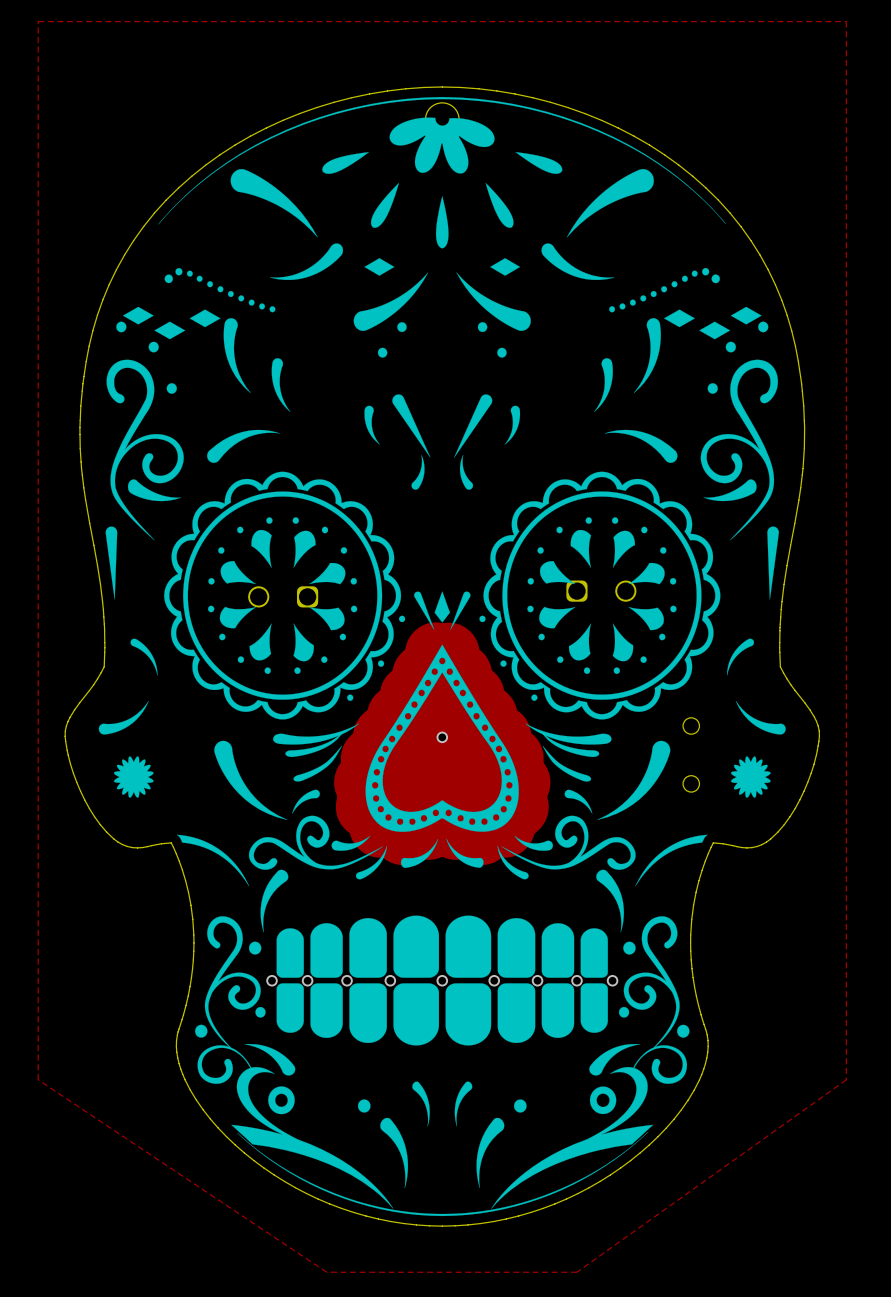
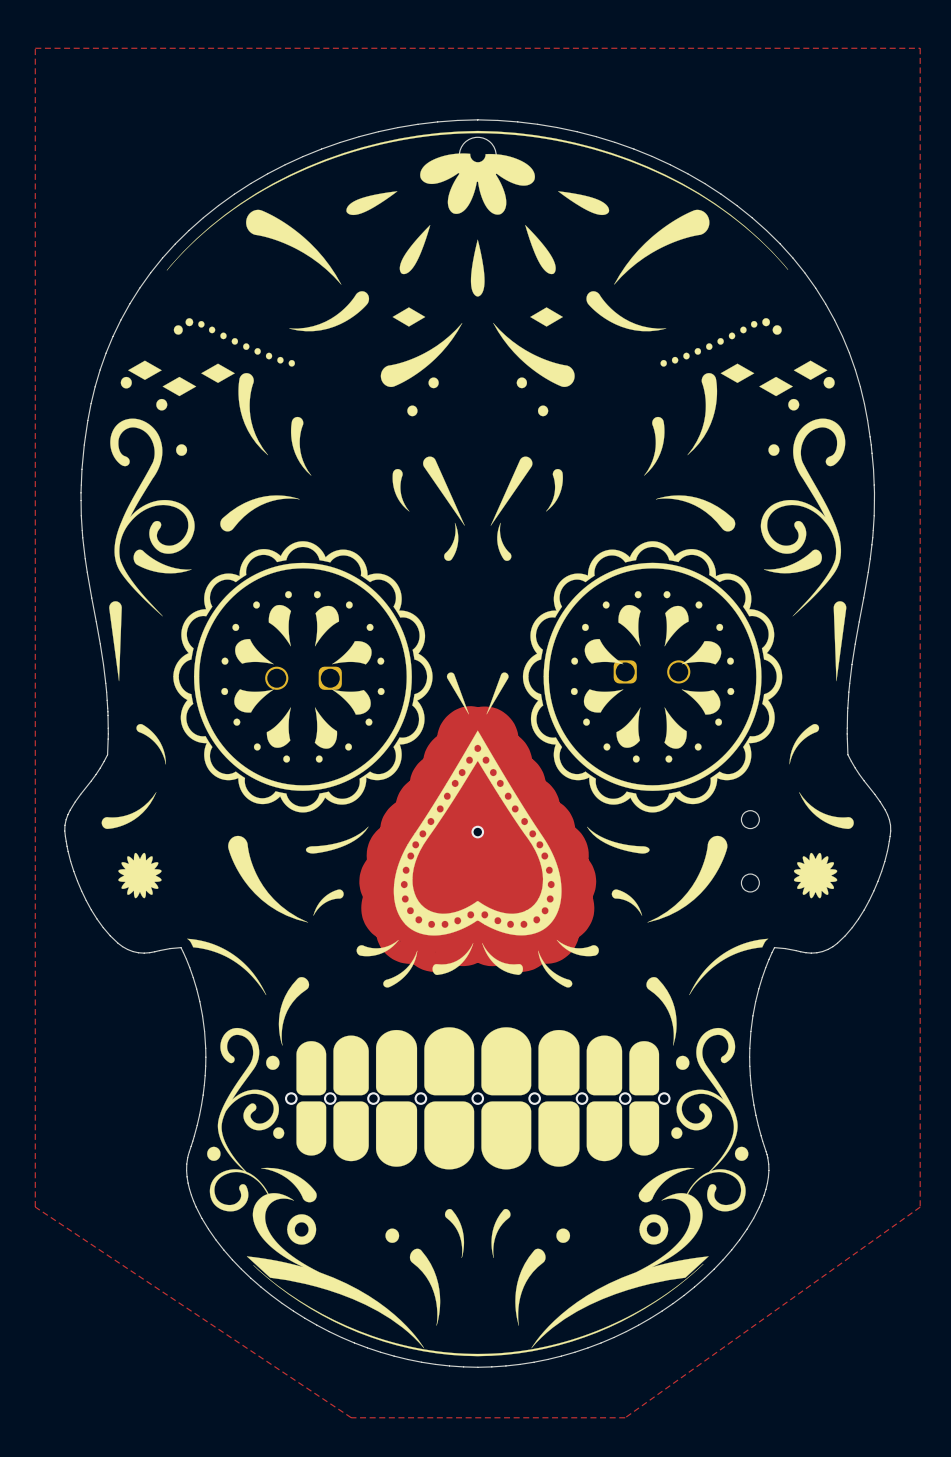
part footprint: [65, 86, 820, 1227] -> [64, 119, 891, 1368]

